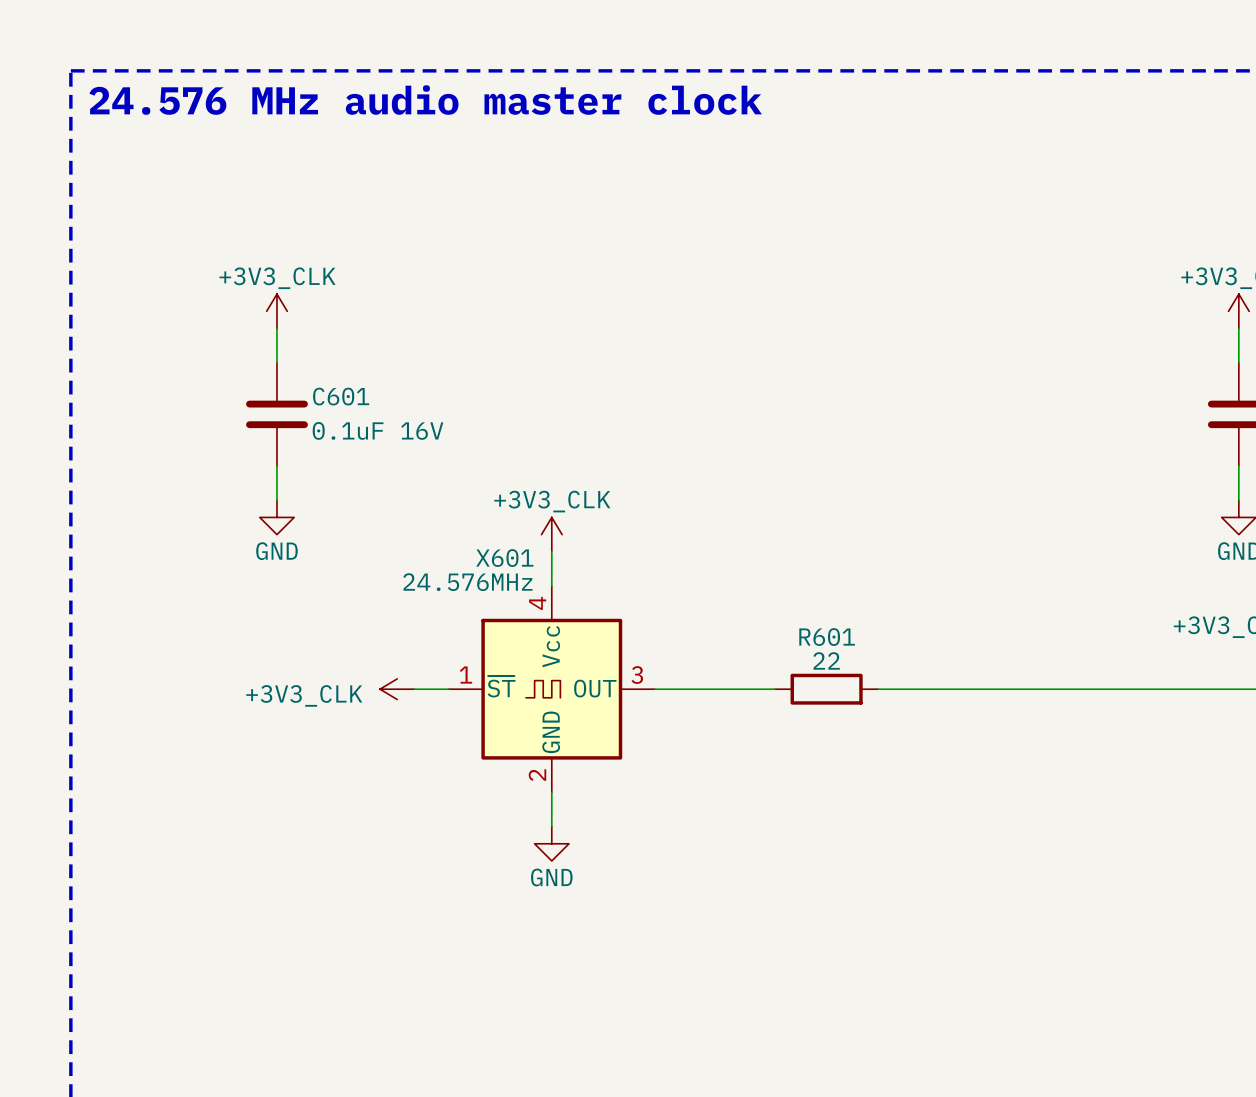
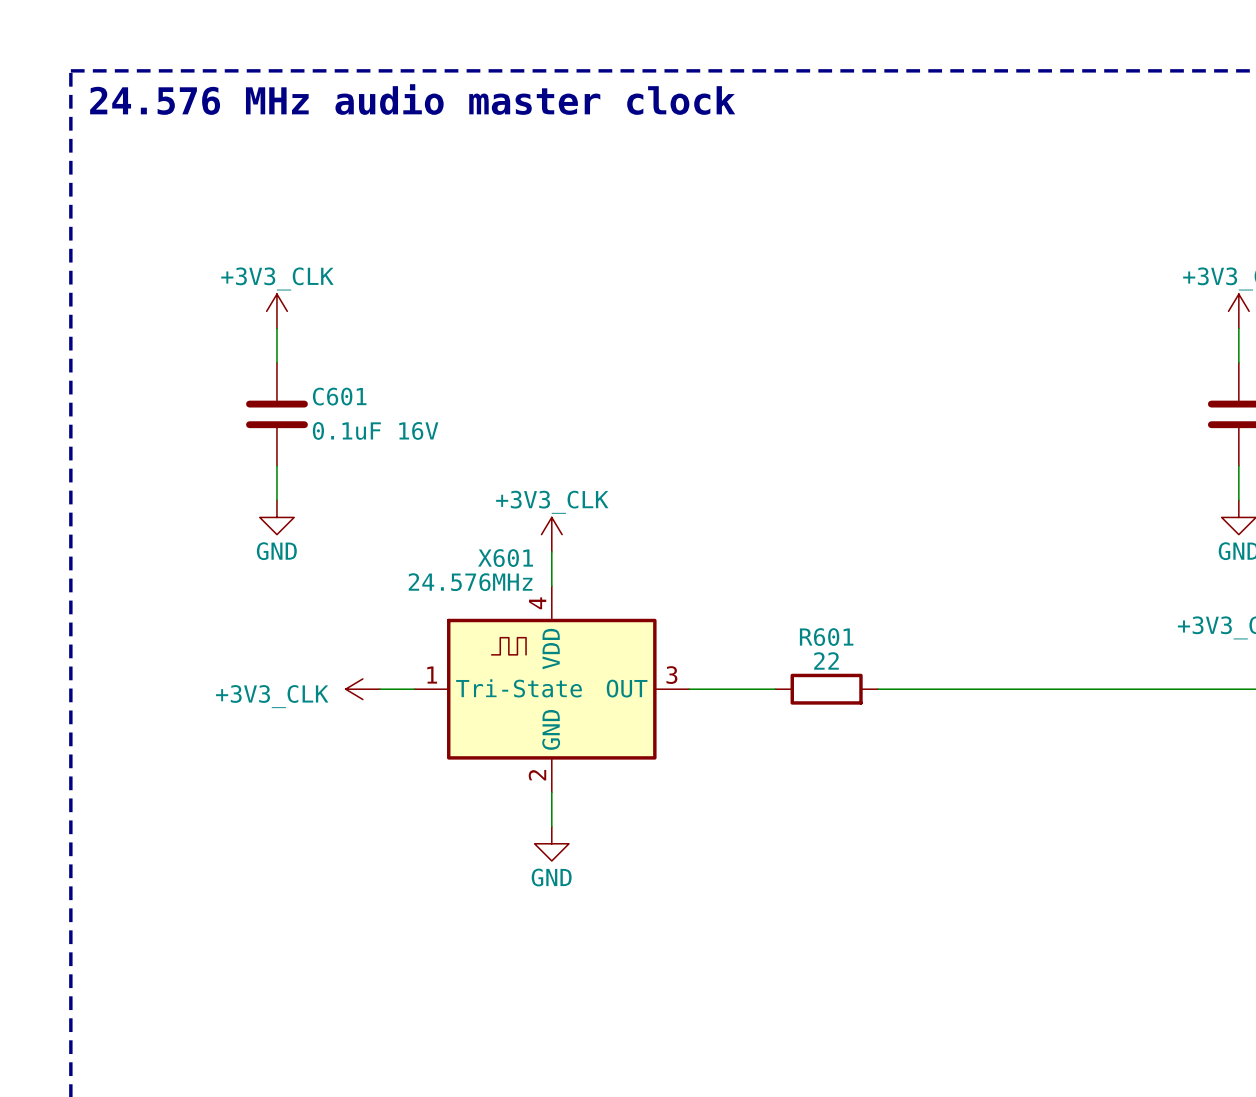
X601 symbol: [448, 586, 655, 793] -> [414, 586, 690, 793]
power symbol position: +3V3_CLK (397, 689) -> +3V3_CLK (362, 689)

